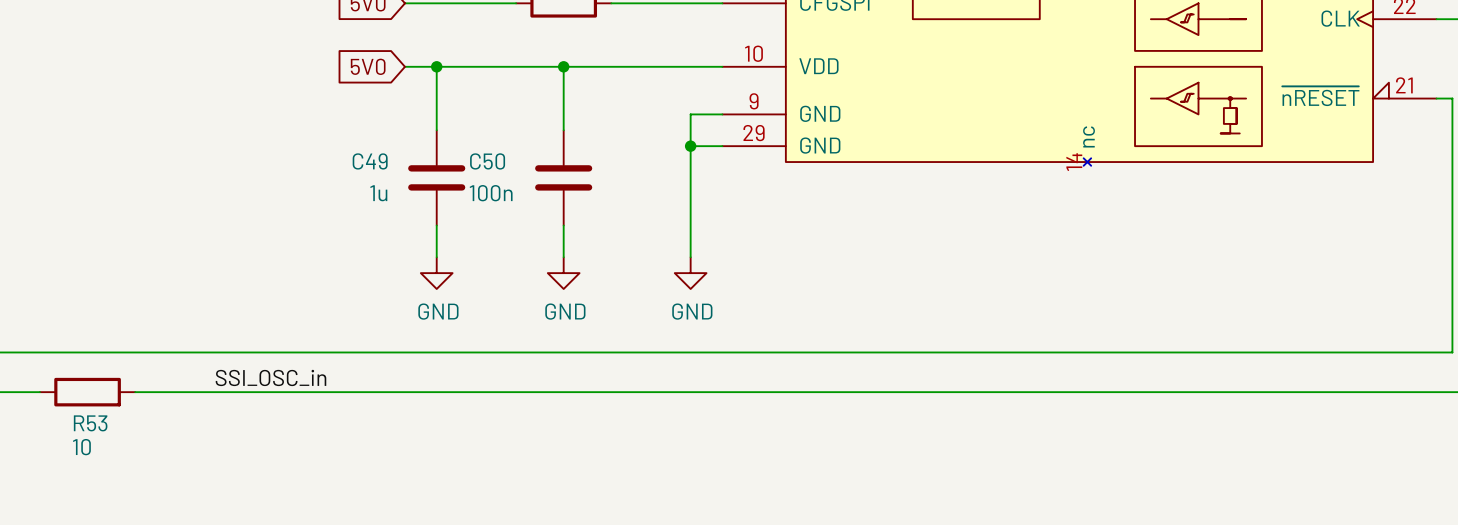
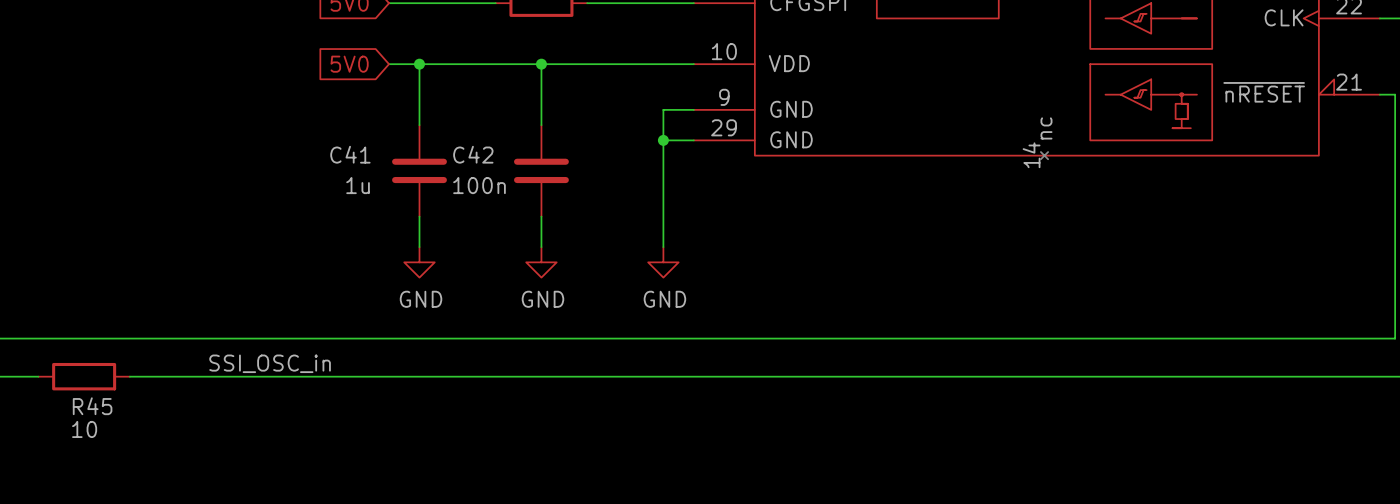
C49 name: C49 (370, 161) -> C41 (350, 154)
C50 name: C50 (487, 161) -> C42 (473, 154)
R53 name: R53 (90, 423) -> R45 (92, 406)

